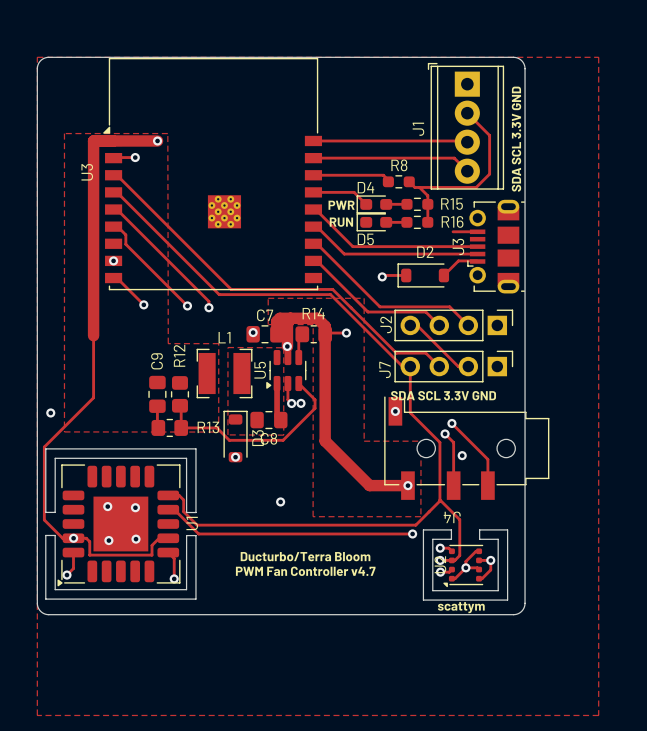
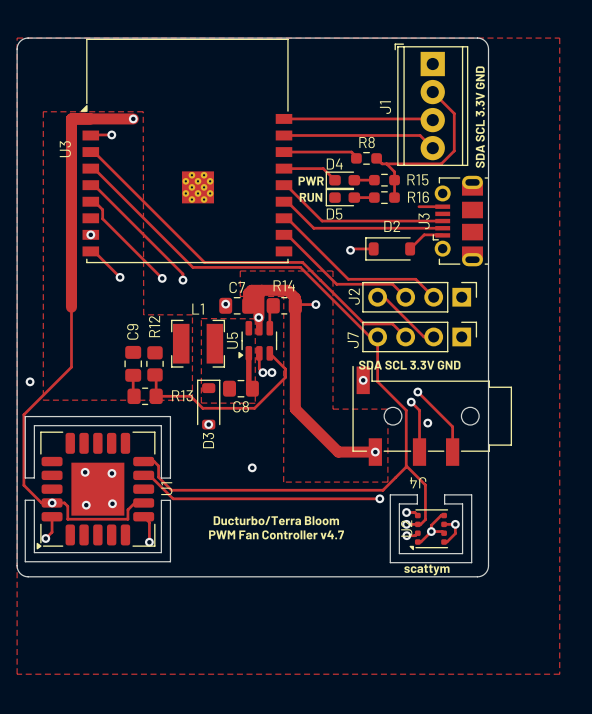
D3 name position: D3 (258, 438) -> D3 (208, 440)

